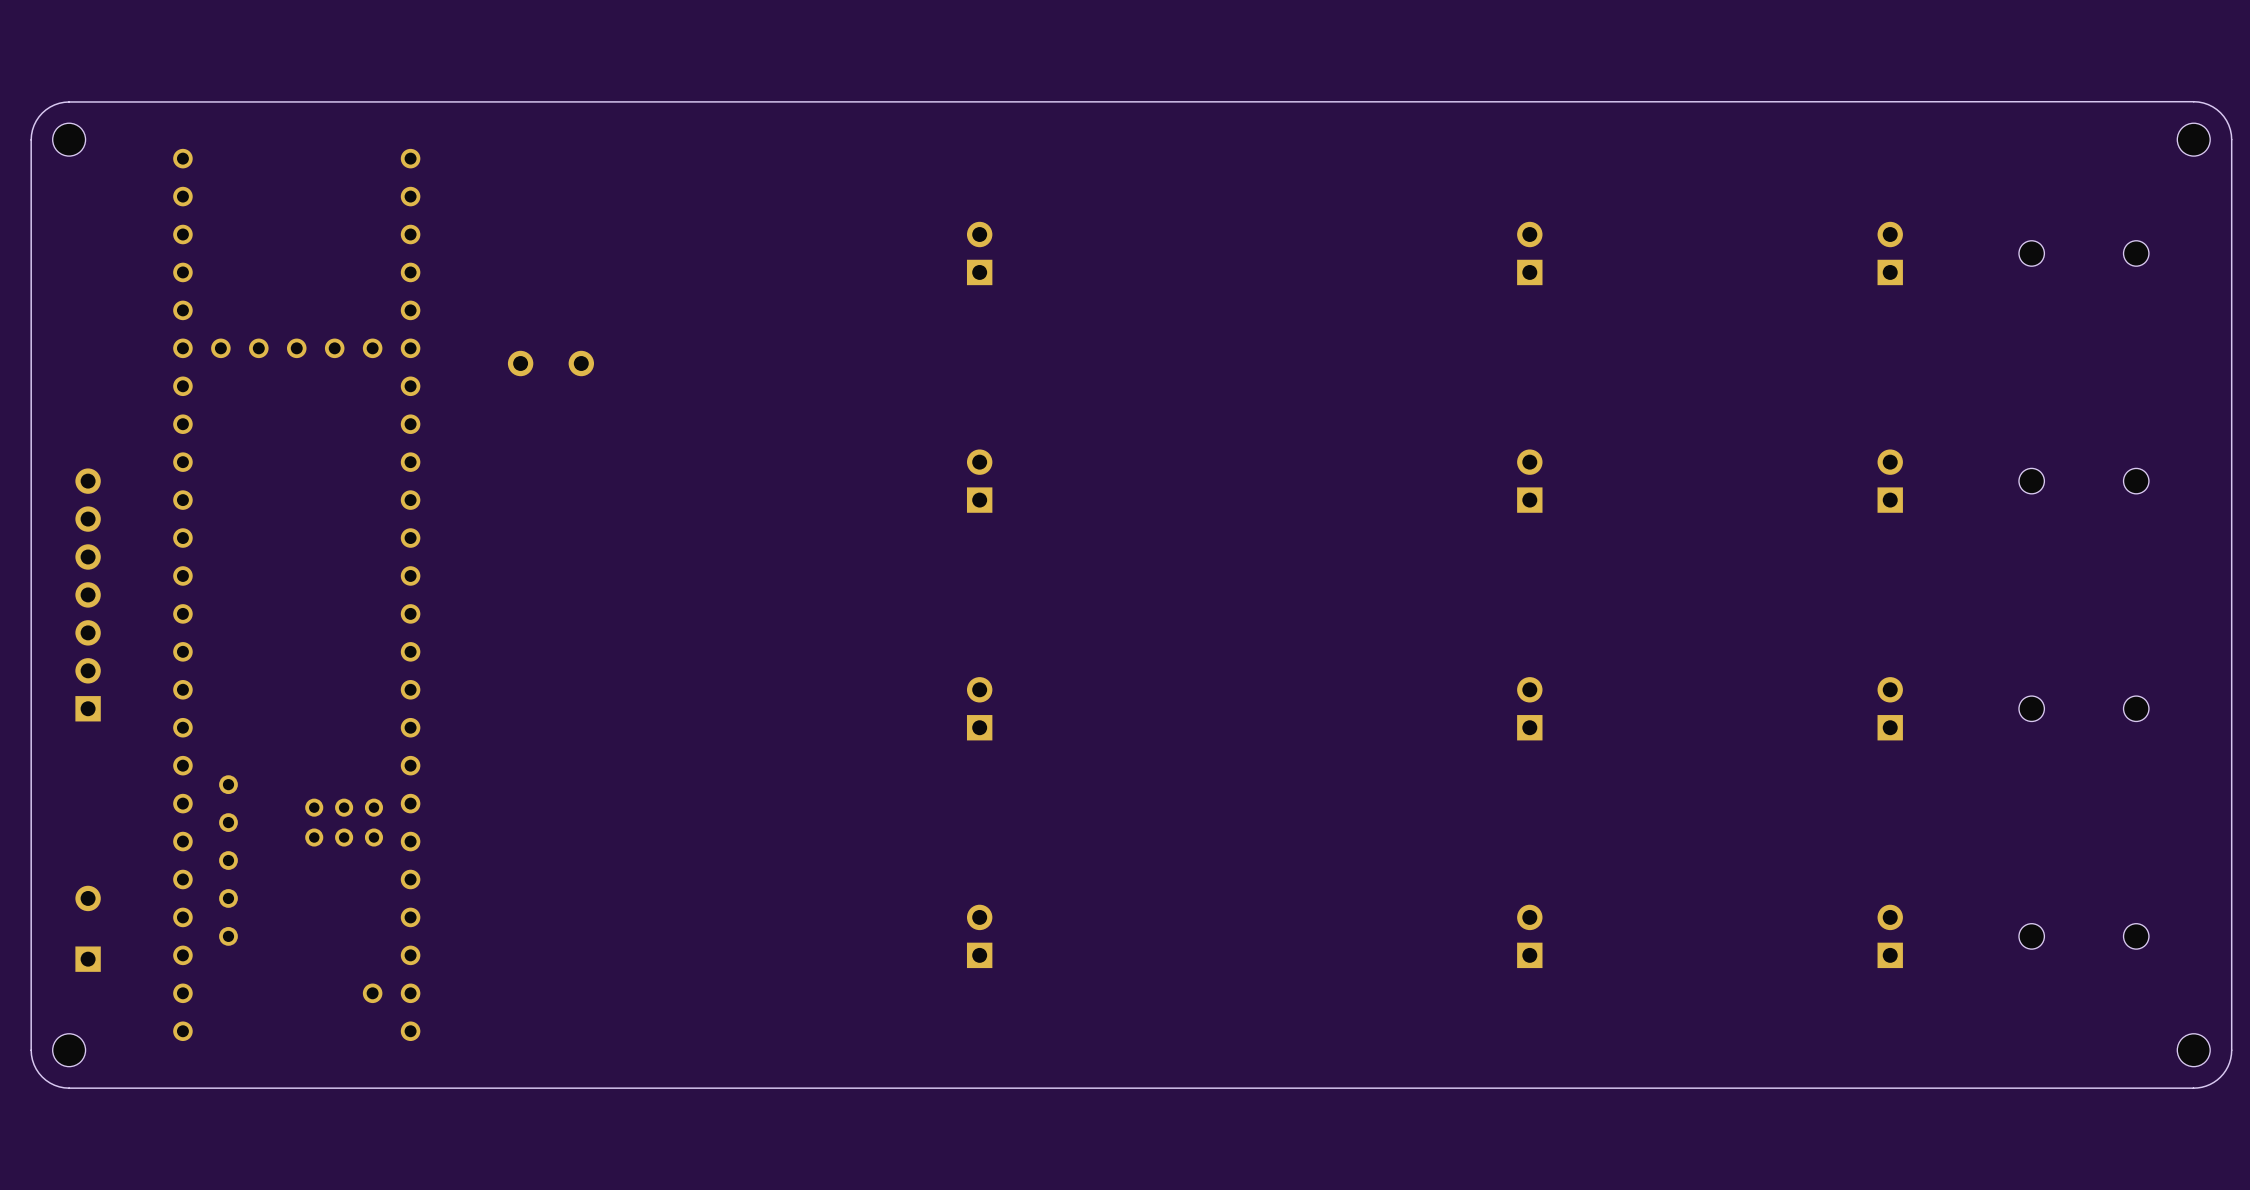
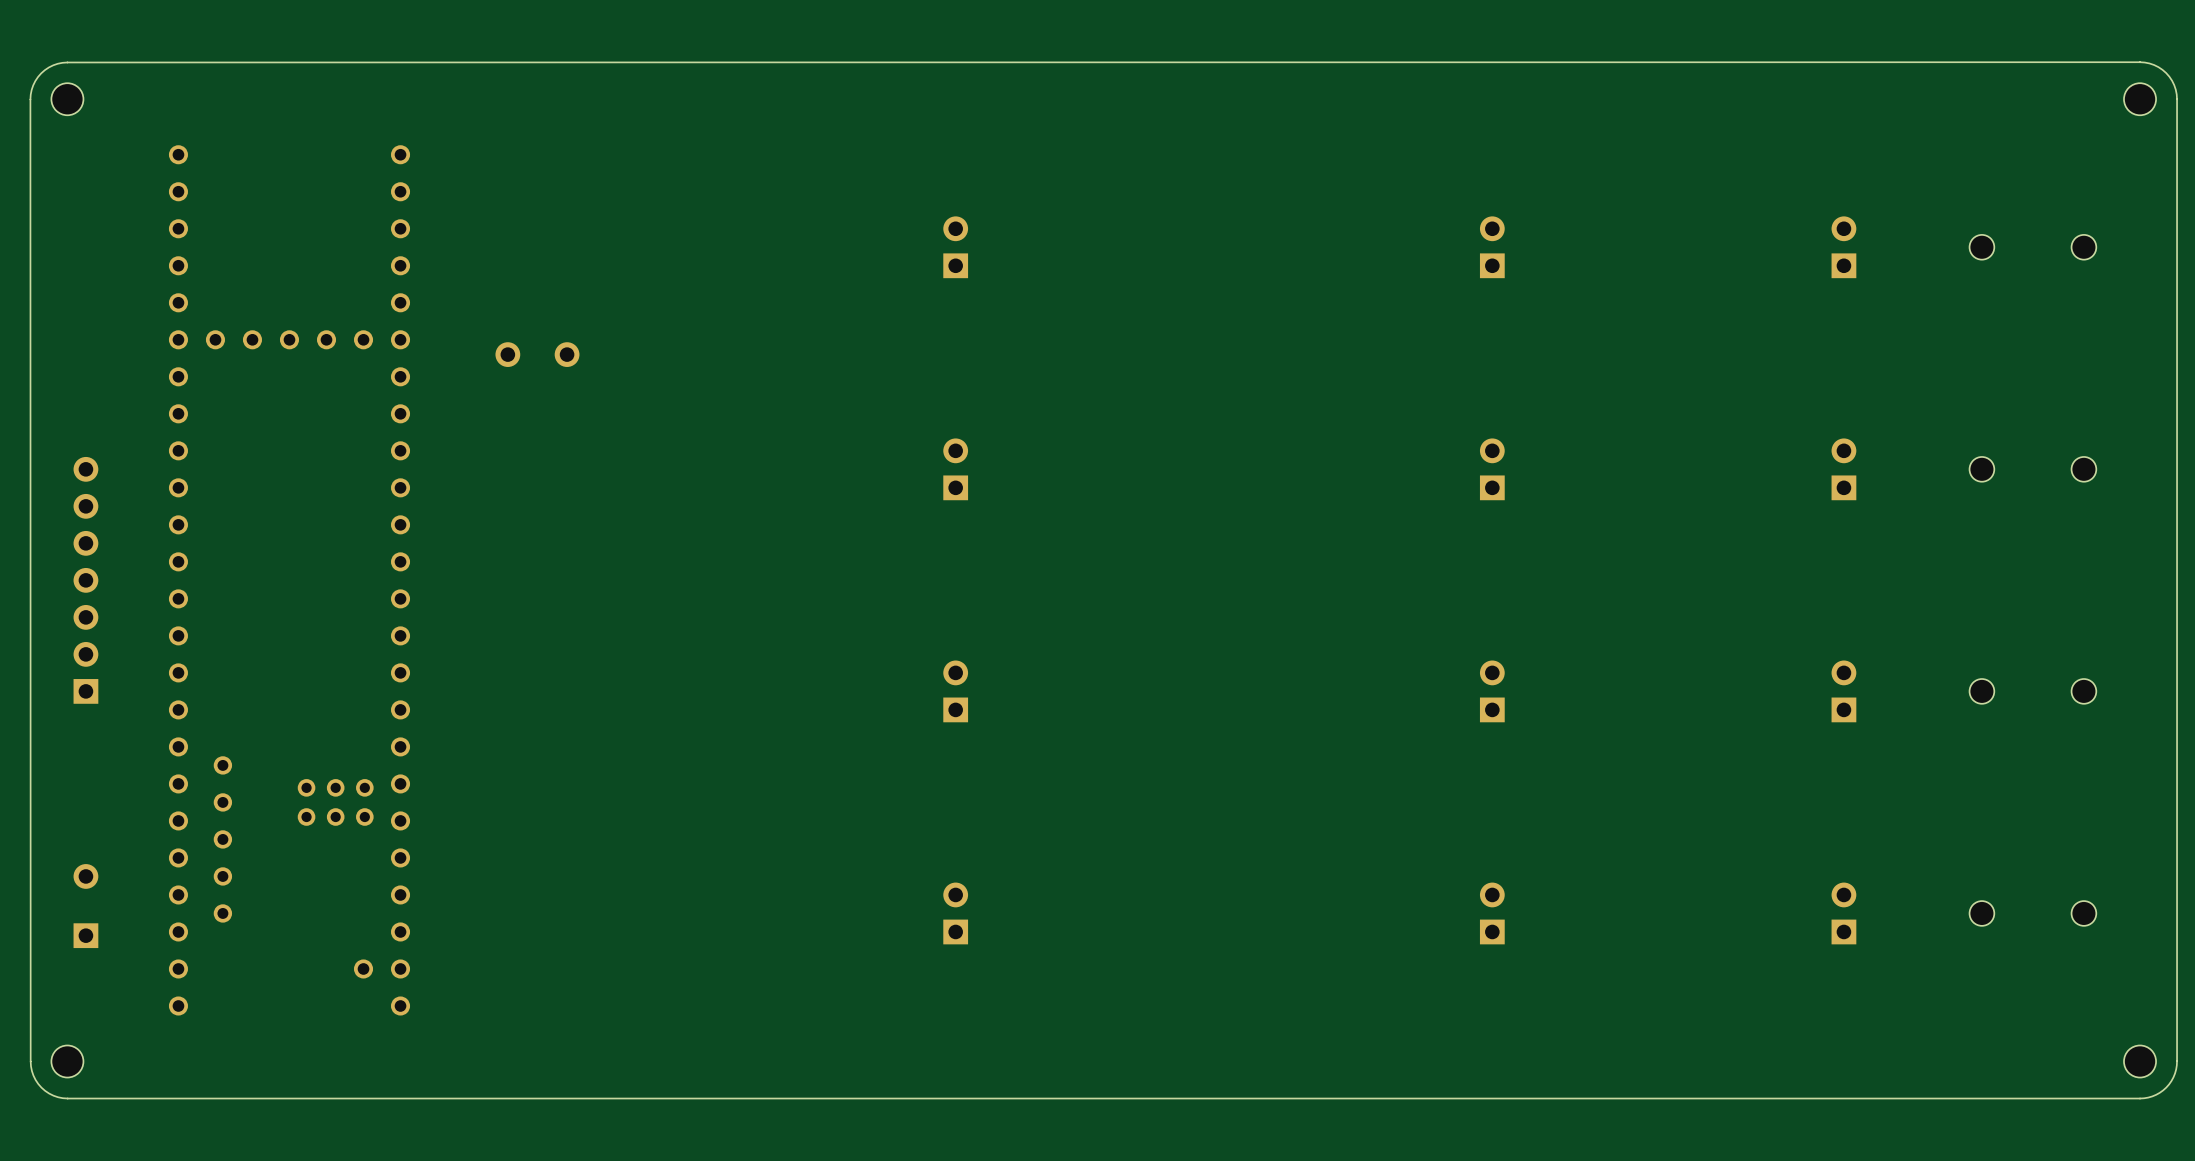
part position: (69, 139) -> (67, 99)
part position: (2193, 139) -> (2140, 99)
board edge: (2231, 139) (2228, 125) (2220, 112) (2208, 104) (2193, 101) (69, 101) (54, 104) (39, 116) (34, 125) (31, 139) (31, 1050) (34, 1064) (42, 1077) (54, 1085) (69, 1088) (2193, 1088) (2206, 1086) (2220, 1077) (2227, 1066) (2231, 1050) -> (2177, 136) (2176, 94) (2172, 80) (2158, 67) (2140, 62) (67, 62) (53, 65) (41, 73) (33, 85) (30, 99) (30, 1061) (35, 1080) (45, 1090) (53, 1095) (67, 1098) (2140, 1098) (2159, 1092) (2173, 1077) (2176, 1065) (2177, 1024)
part position: (69, 1050) -> (67, 1061)
part position: (2193, 1050) -> (2140, 1061)

